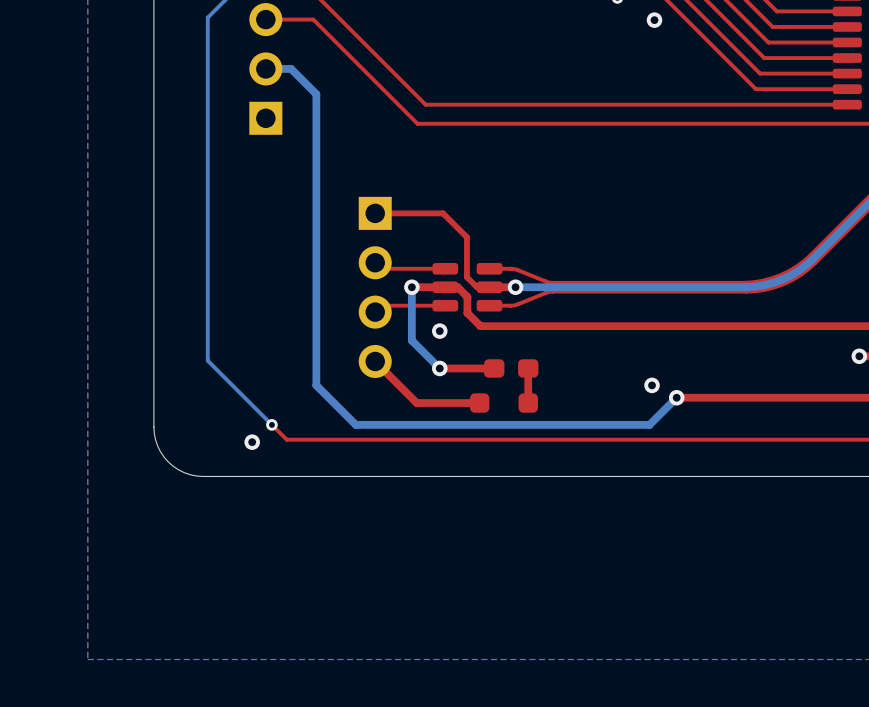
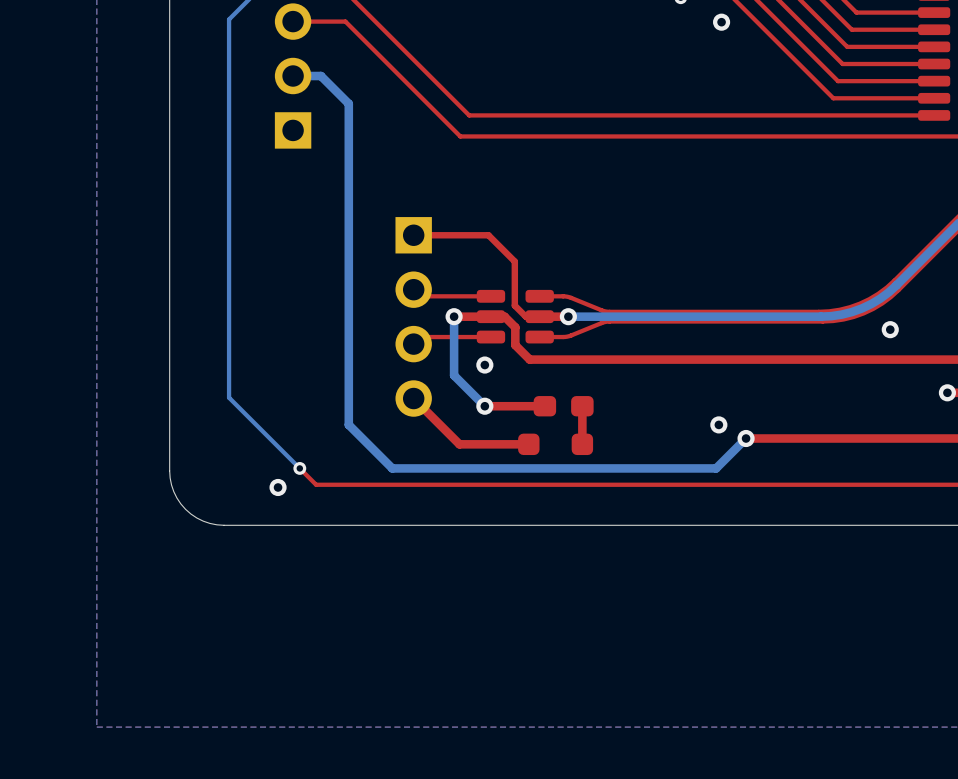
via: none -> (890, 329)

